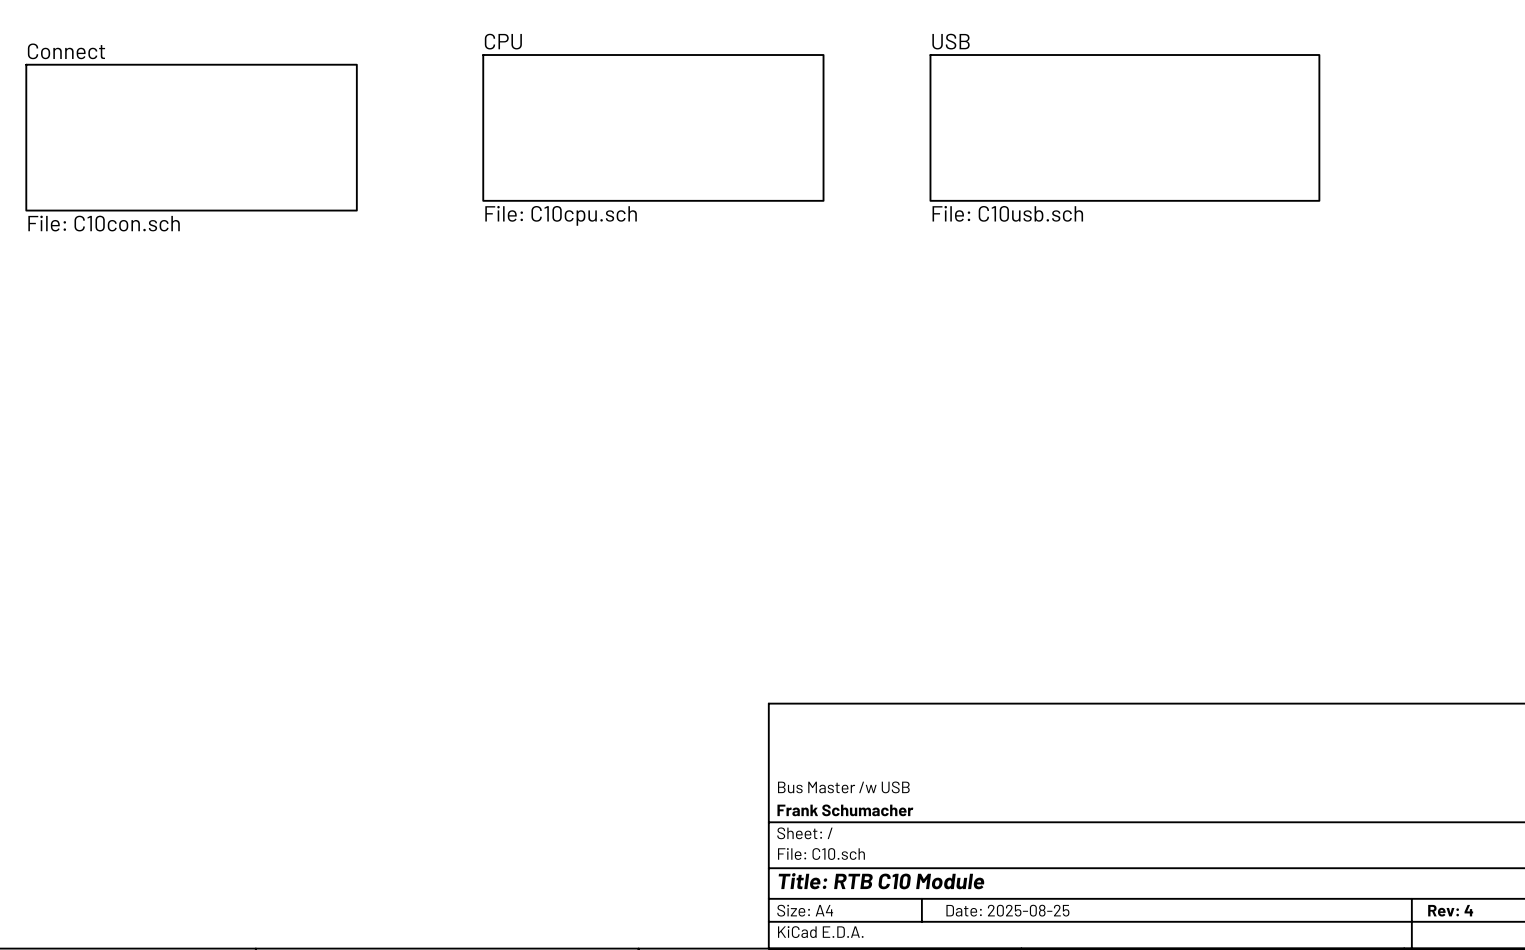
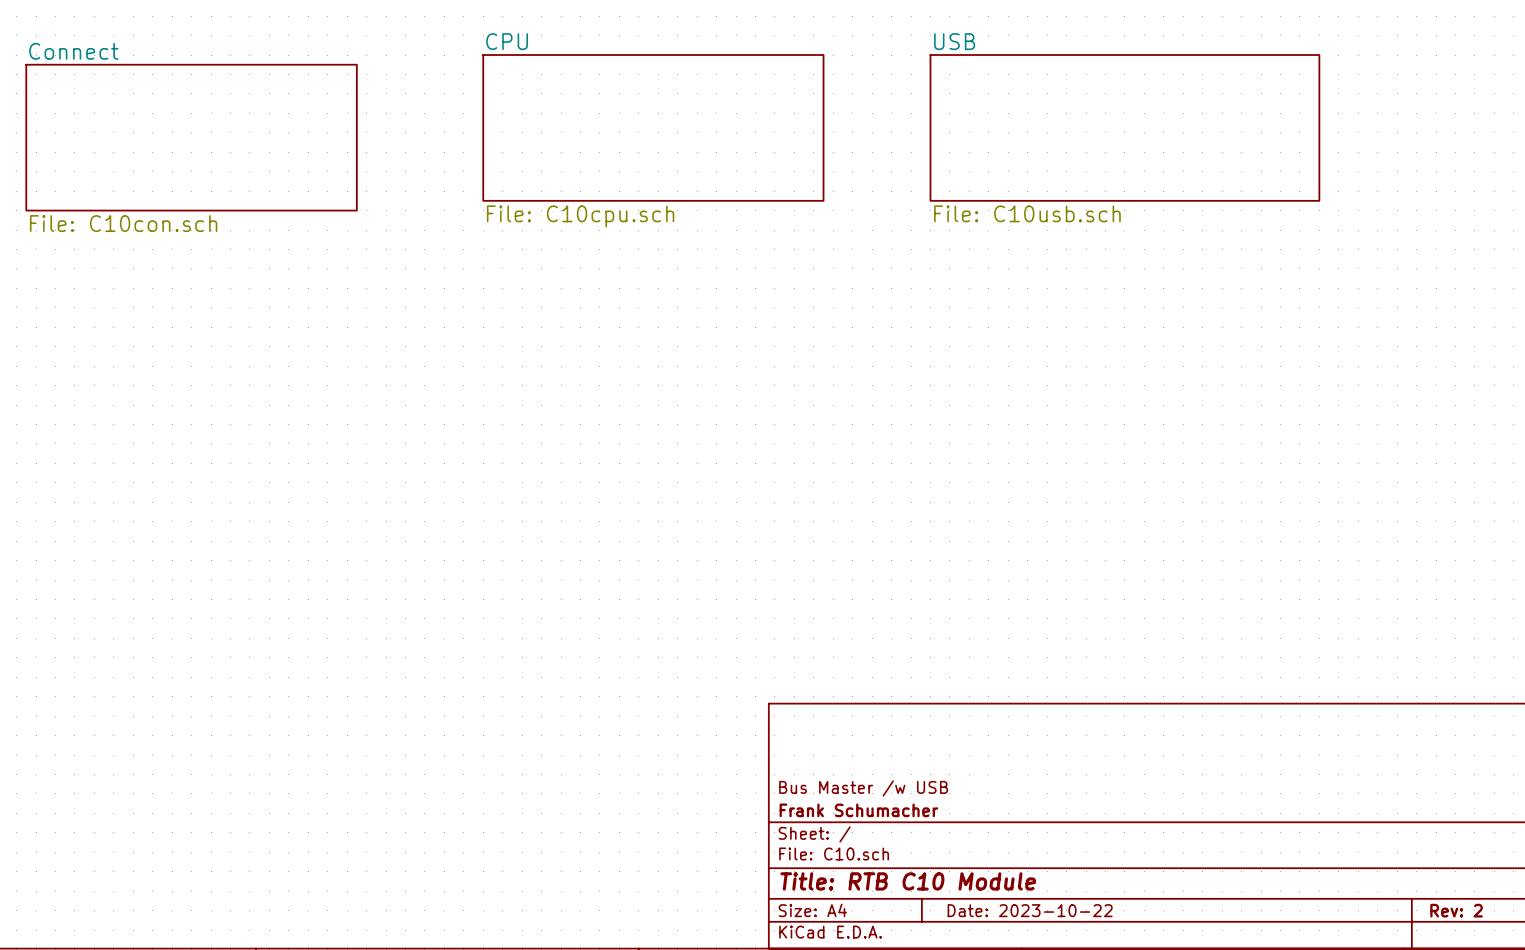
title block: Date: 2025-08-25 (1007, 910) -> Date: 2023-10-22 (1030, 910)
title block: Rev: 4 (1450, 910) -> Rev: 2 (1456, 910)

